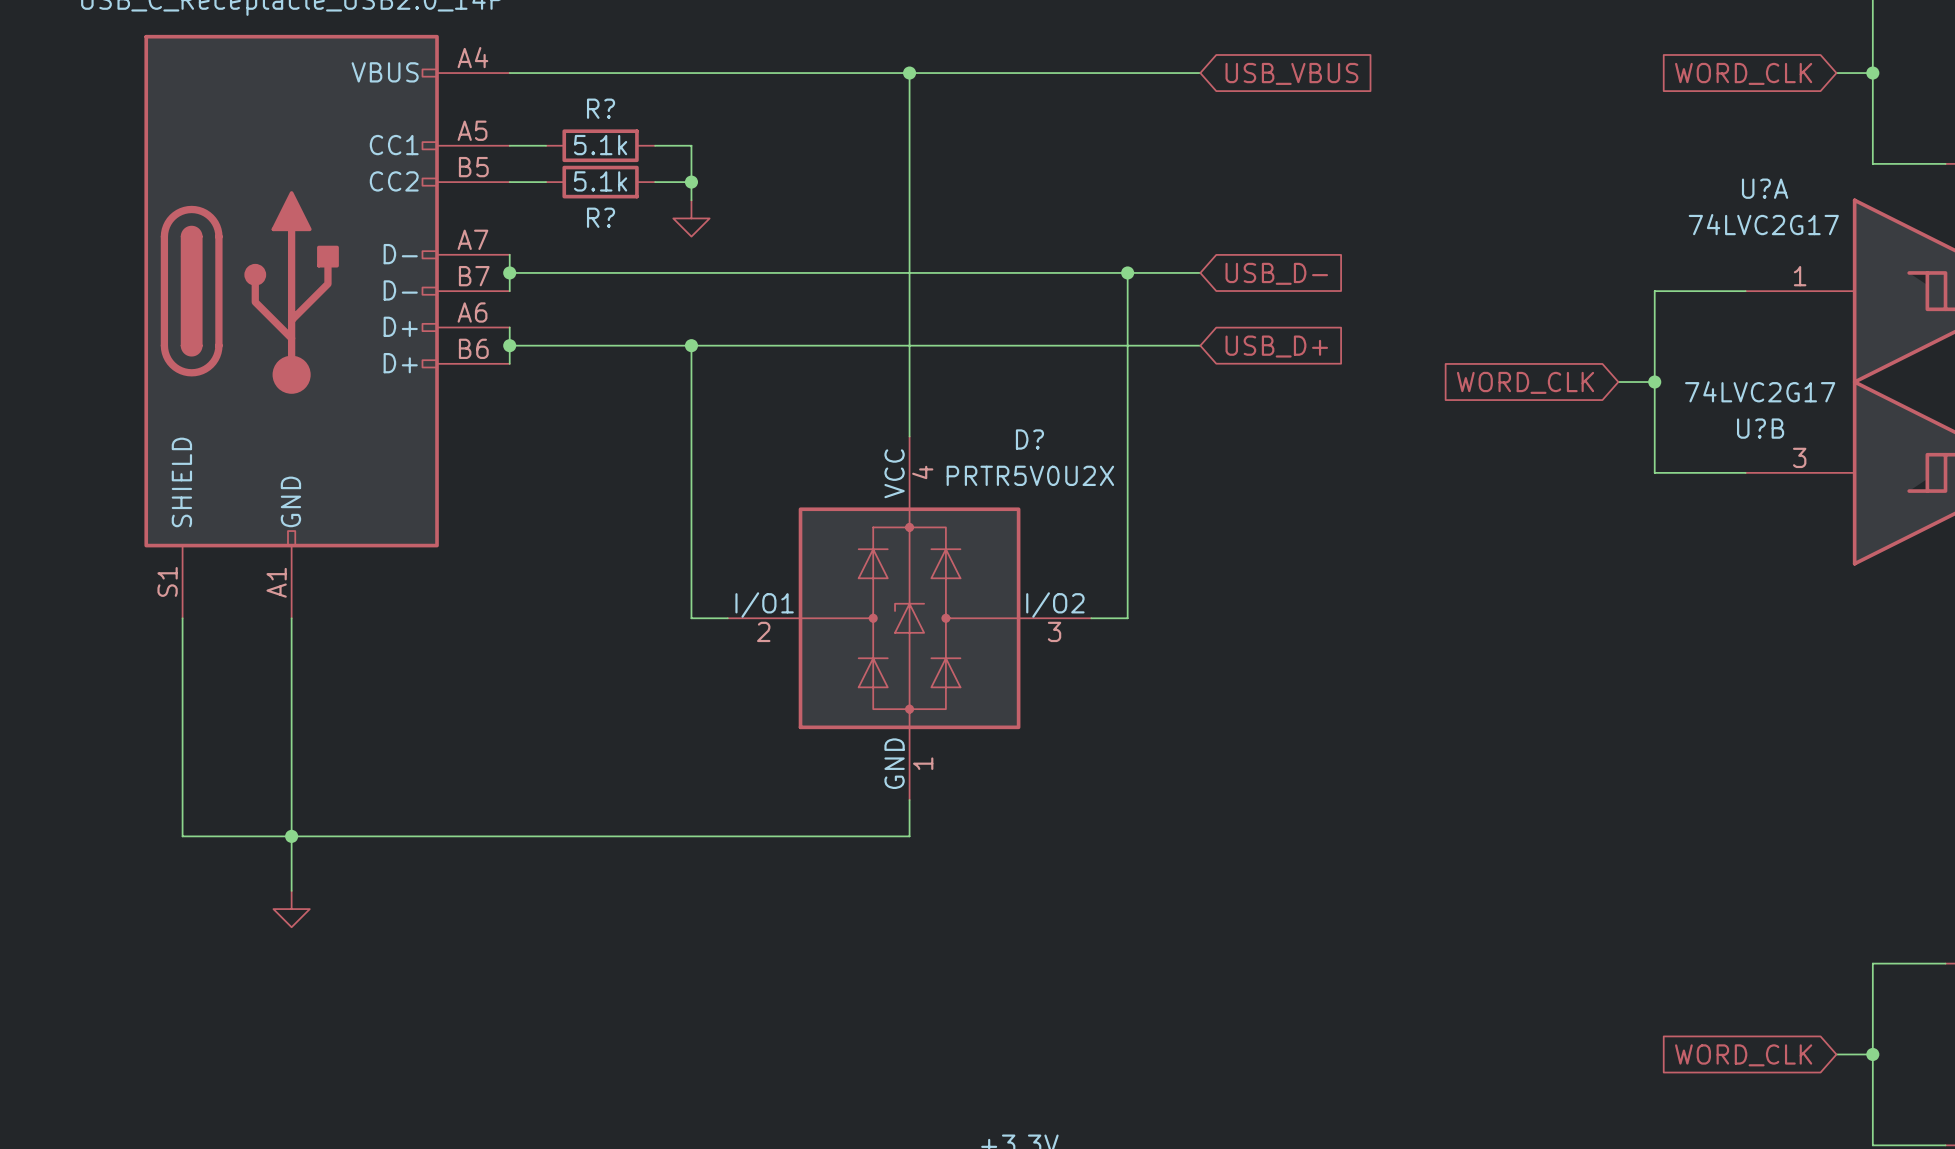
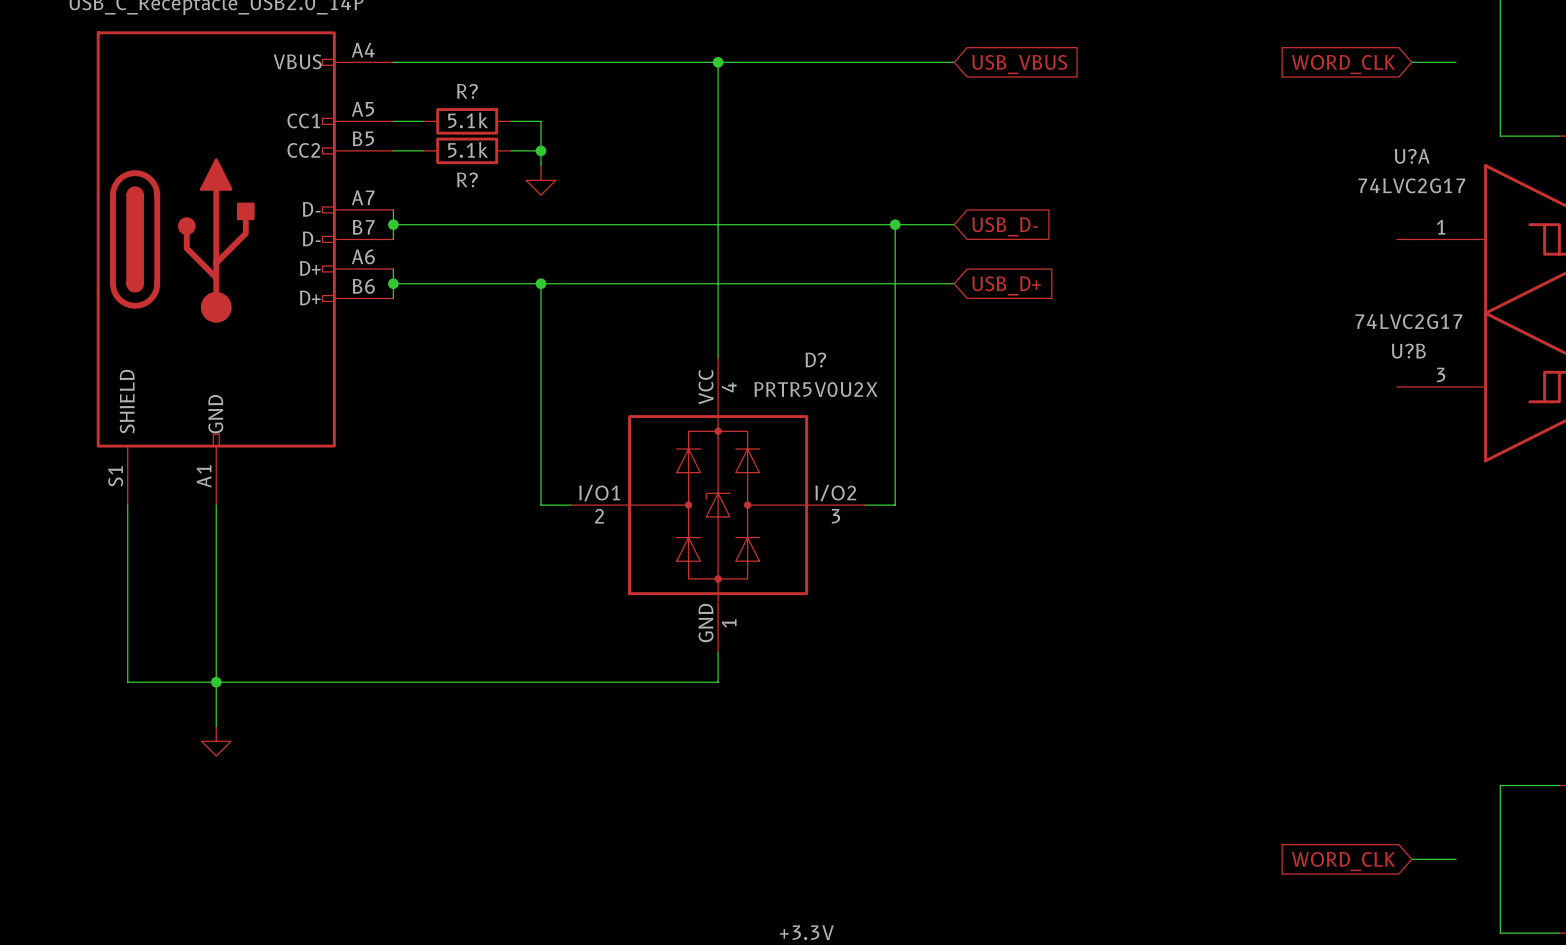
global label position: WORD_CLK (1743, 73) -> WORD_CLK (1343, 64)
wire: none -> (1411, 62) (1456, 62)
wire: (1836, 73) (1872, 73) -> none
junction: (1872, 73) -> none
wire: (1745, 291) (1654, 291) (1654, 472) (1745, 472) -> none
global label: WORD_CLK (1525, 382) -> none
wire: (1618, 382) (1654, 382) -> none
junction: (1654, 382) -> none
wire: none -> (1411, 859) (1456, 859)
wire: (1836, 1054) (1872, 1054) -> none
junction: (1872, 1054) -> none
global label position: WORD_CLK (1743, 1055) -> WORD_CLK (1343, 861)

